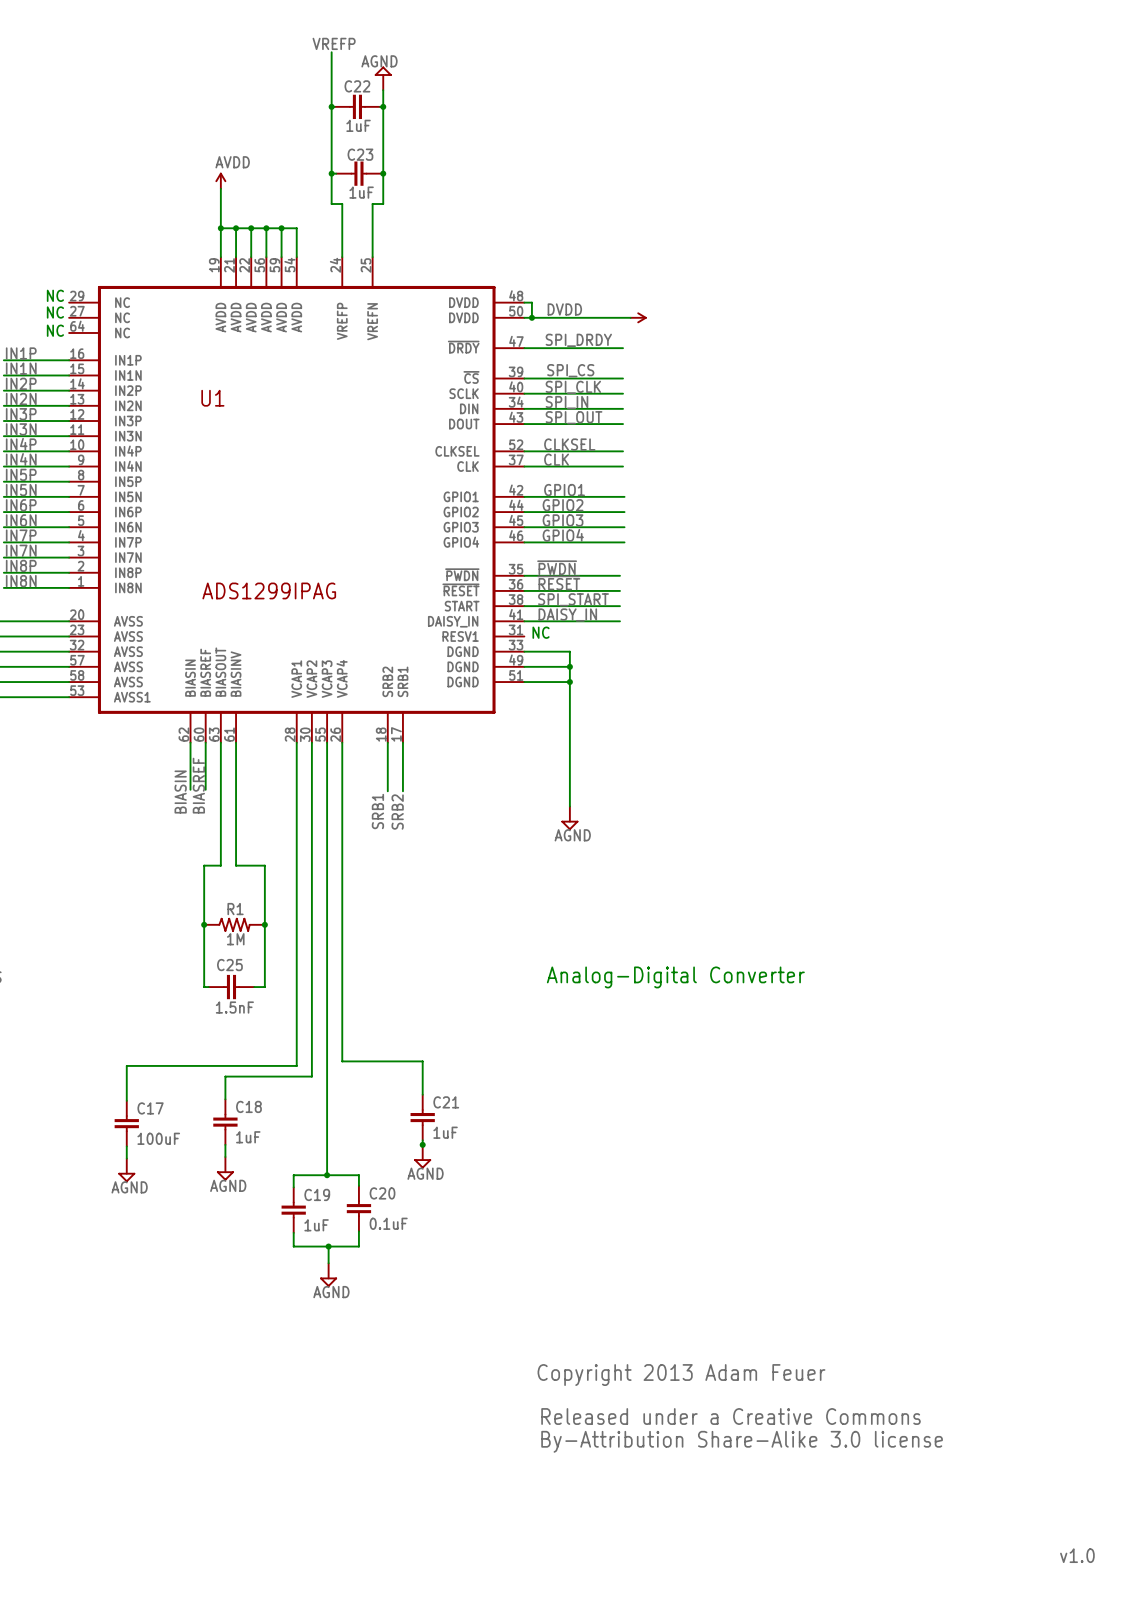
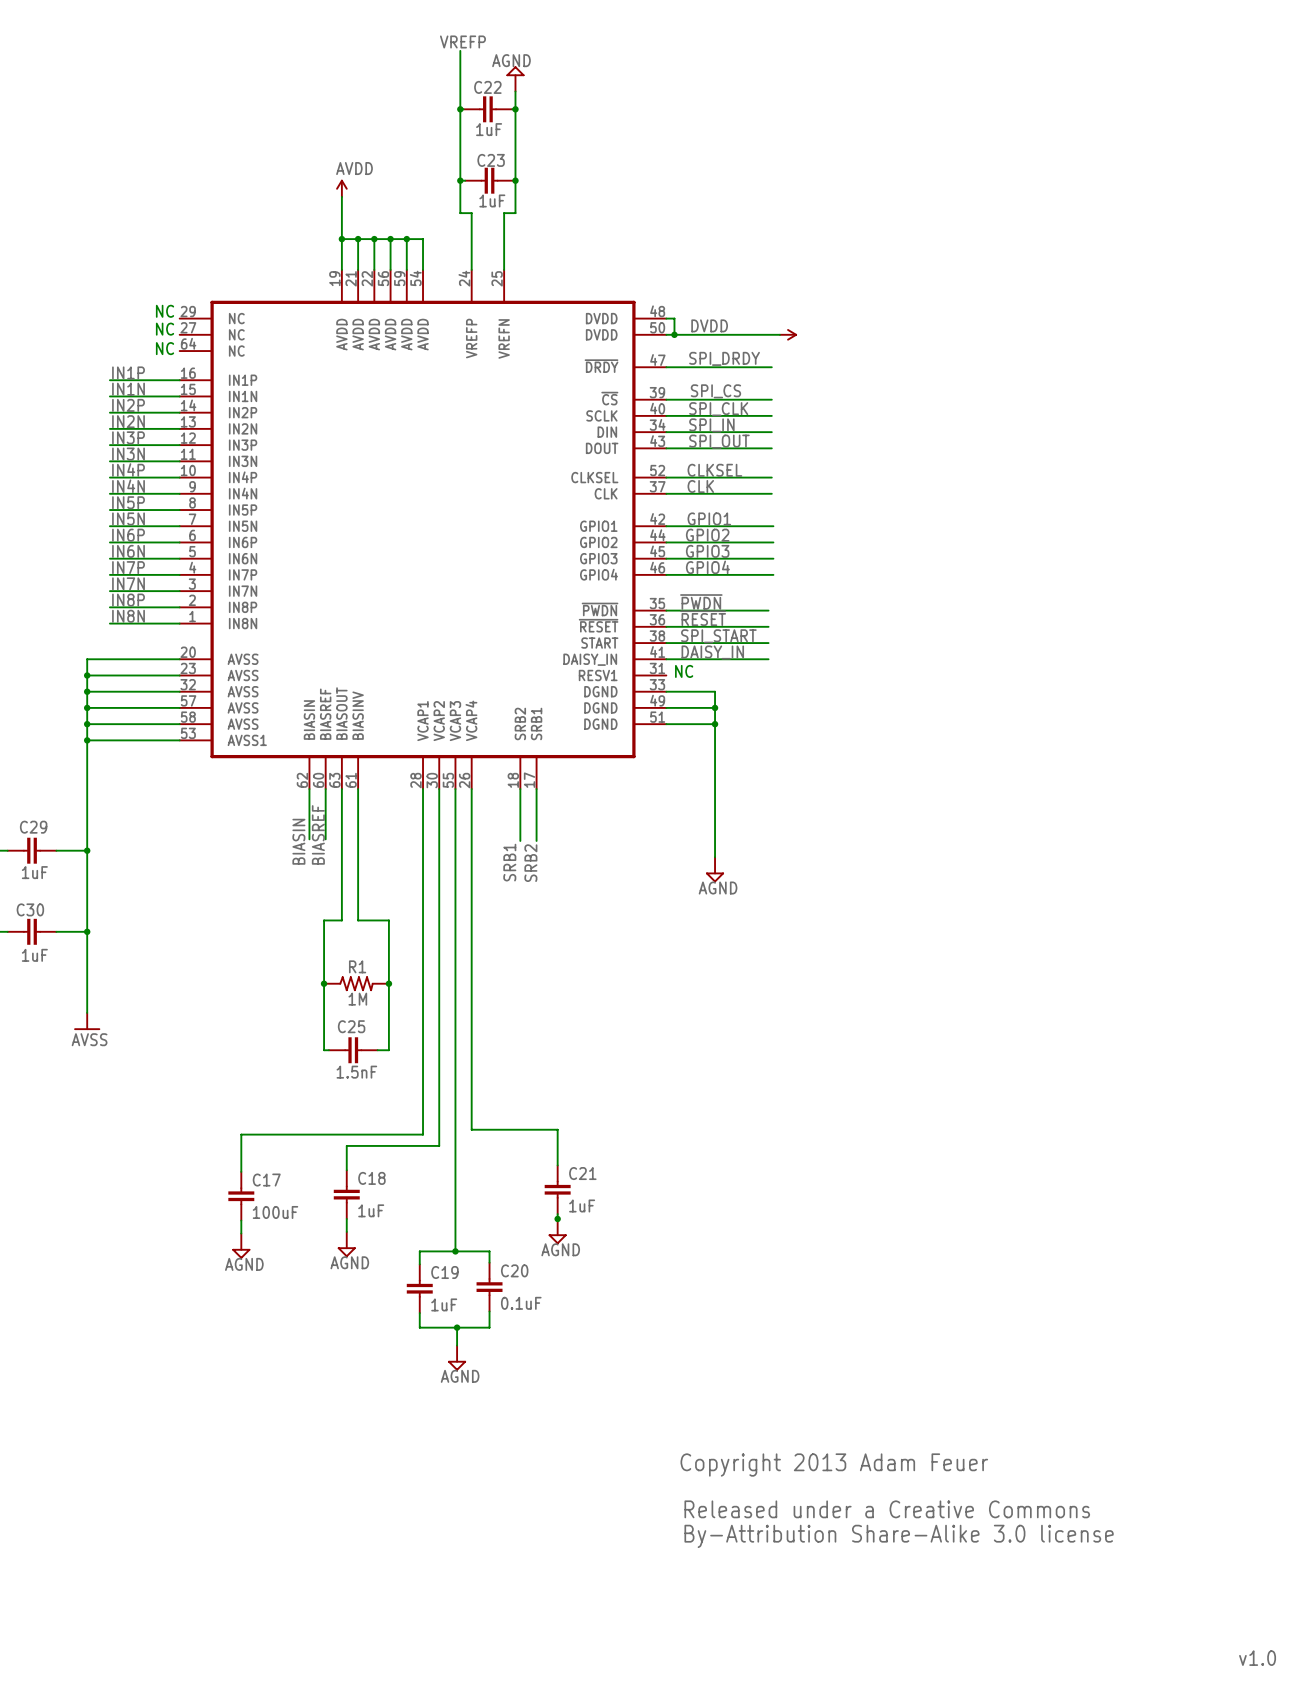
U1 name: U1 (212, 398) -> none
U1 value: ADS1299IPAG (269, 590) -> none
text: Analog-Digital Converter (675, 977) -> none

